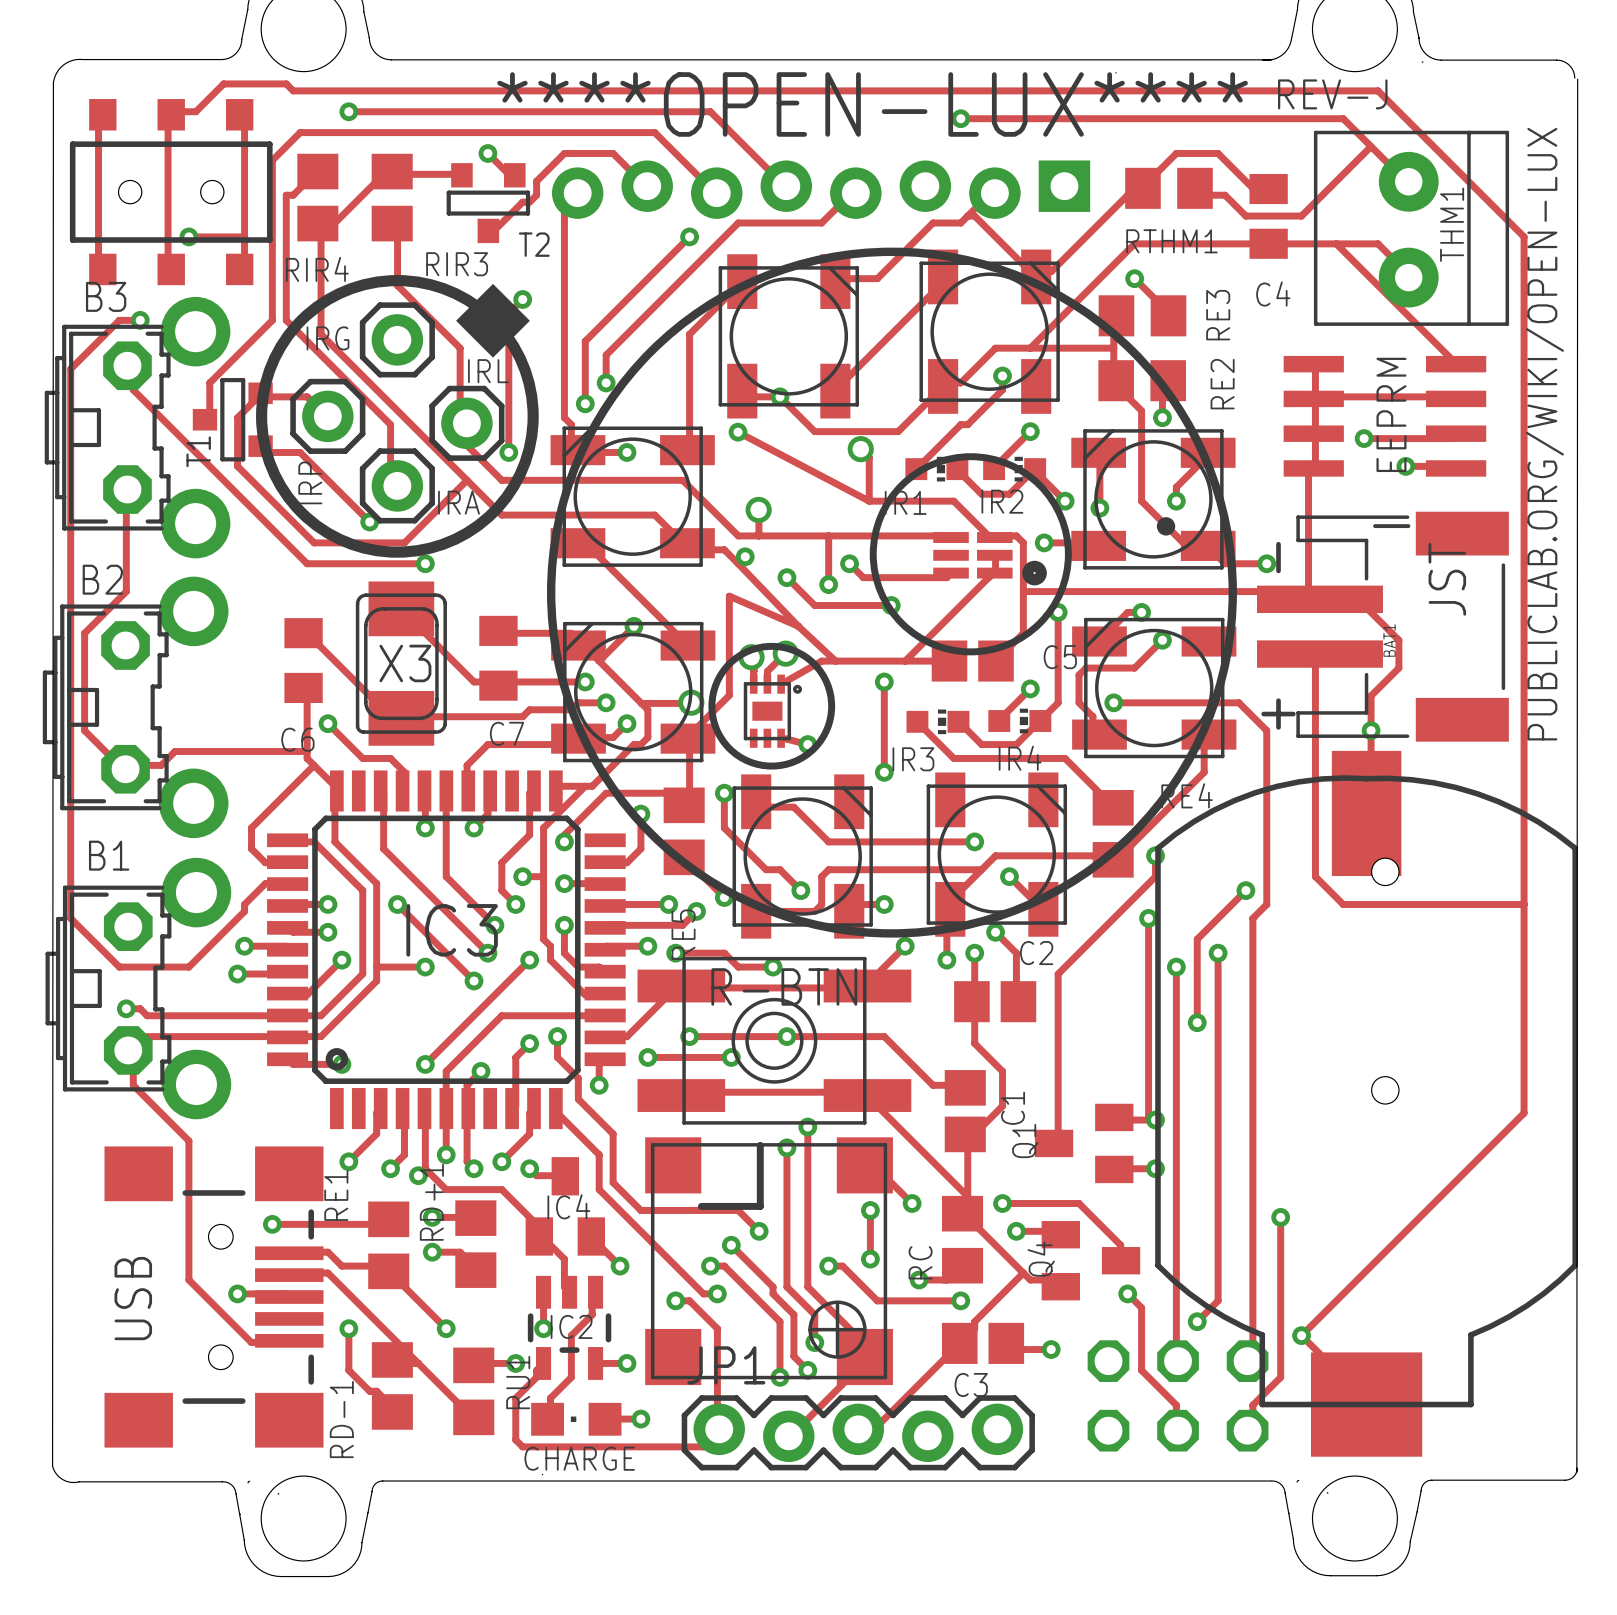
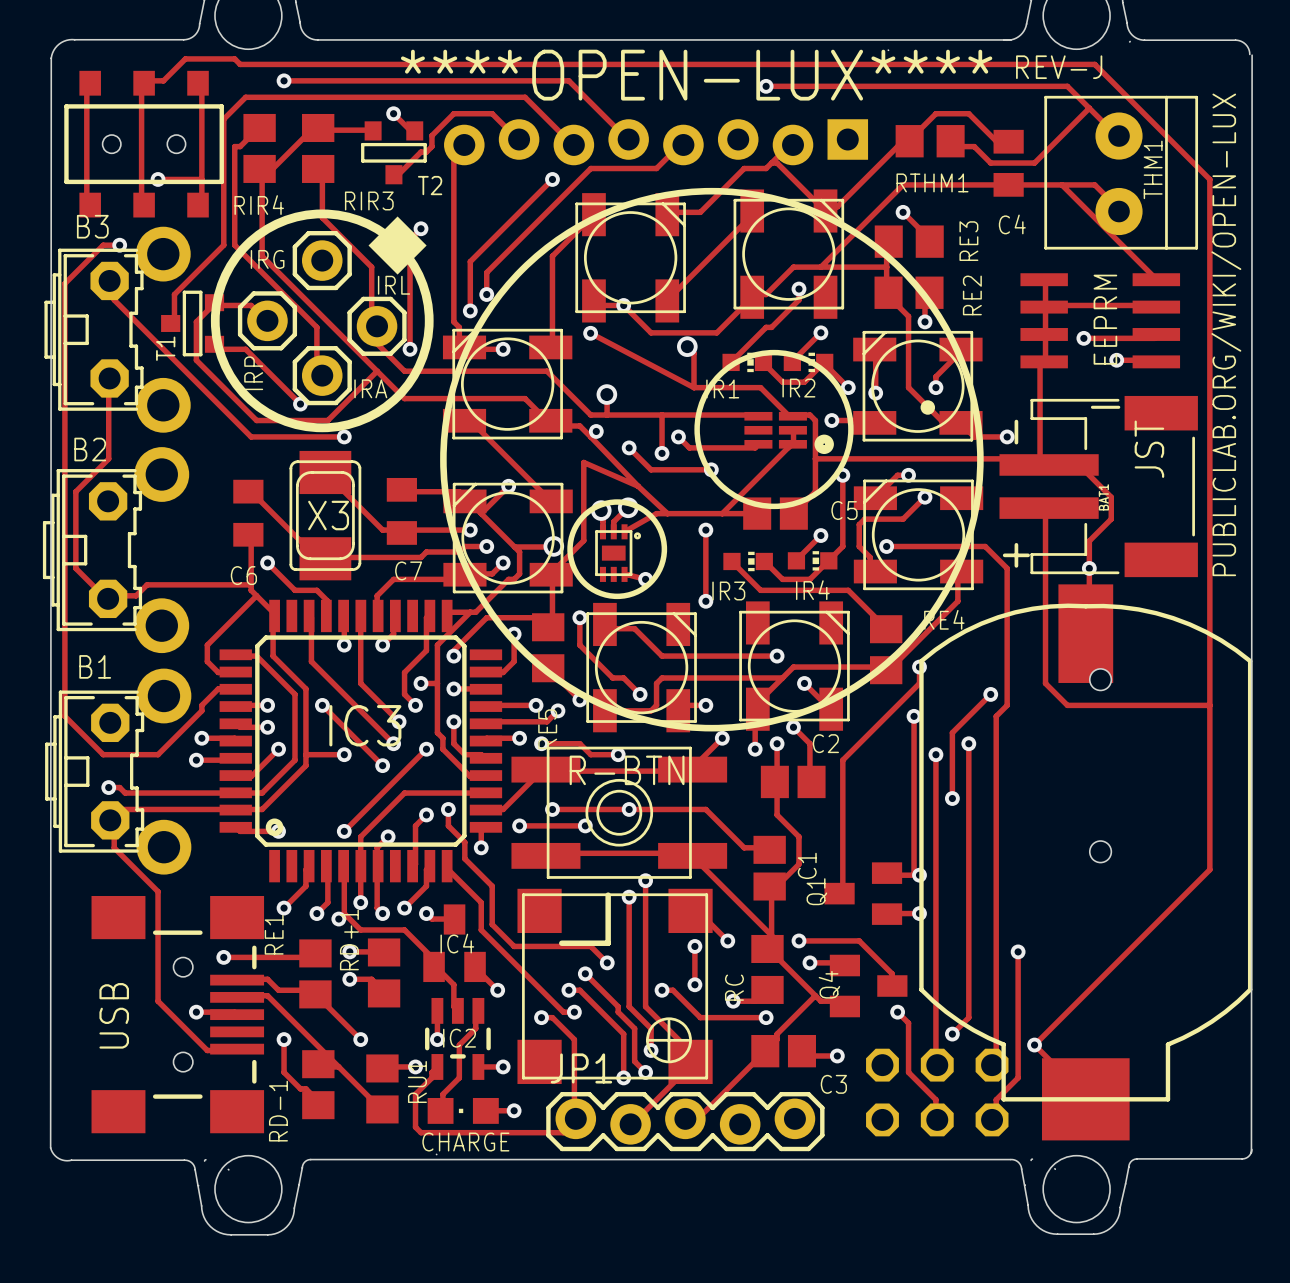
C3 name position: C3 (971, 1384) -> C3 (833, 1084)

